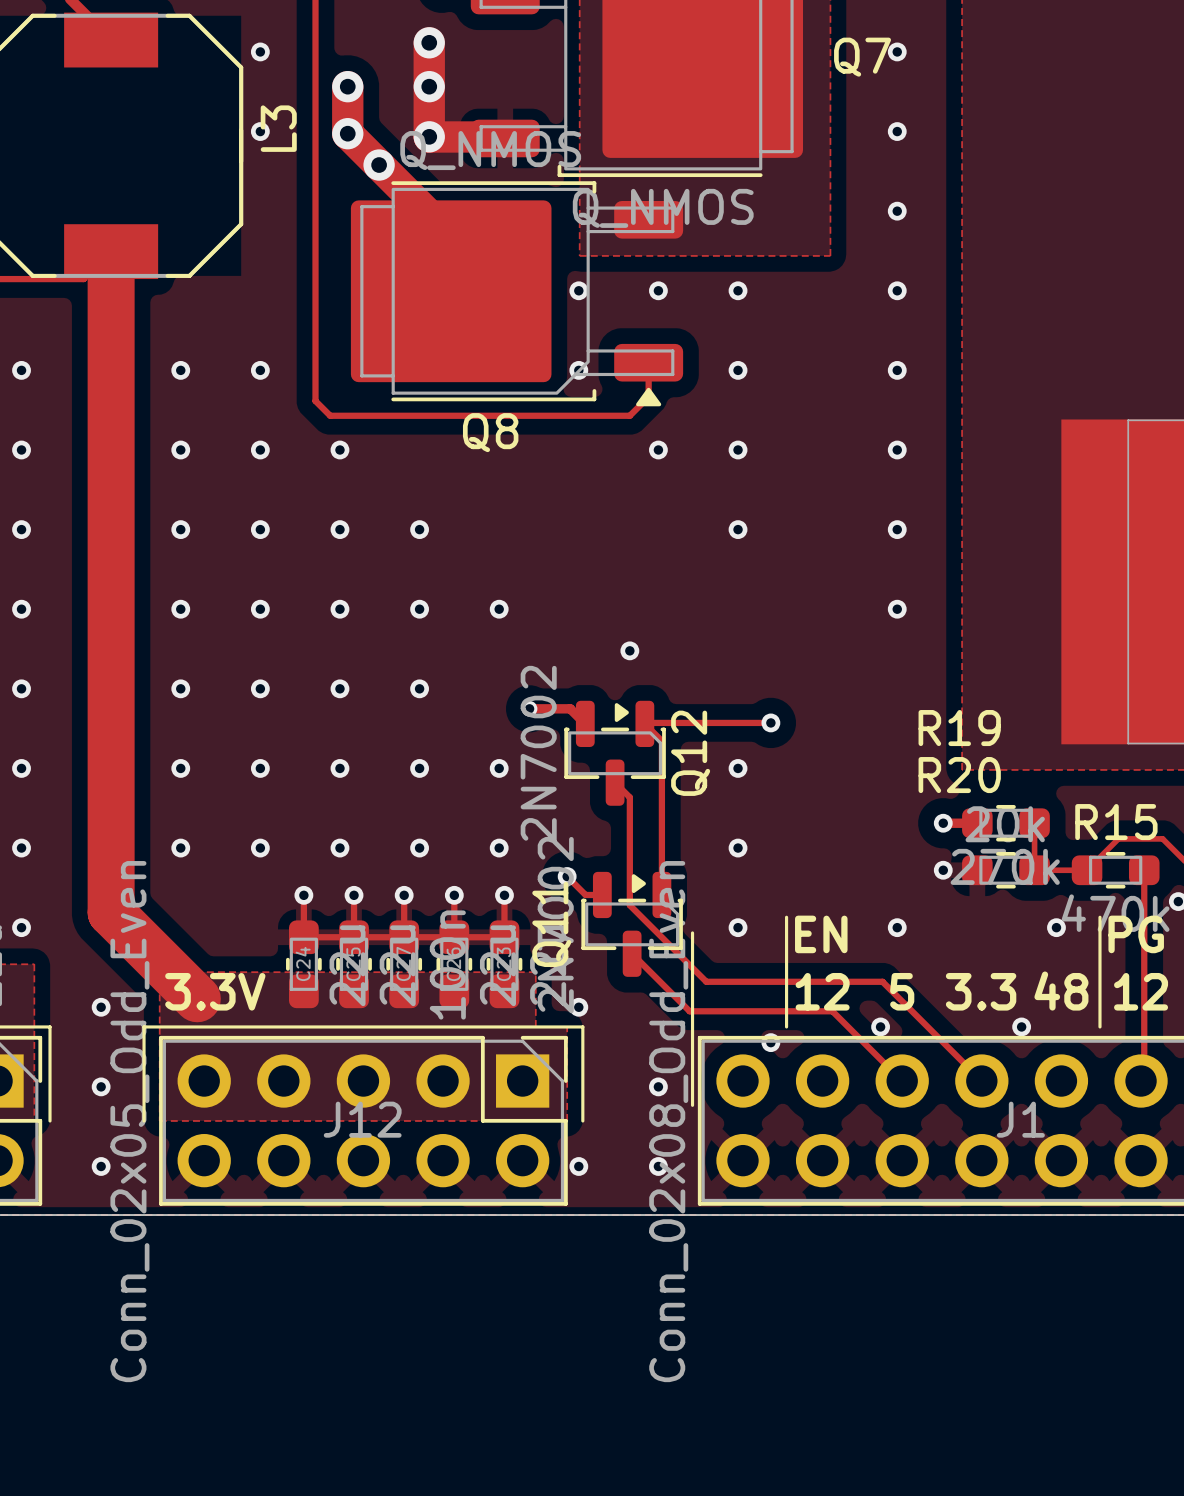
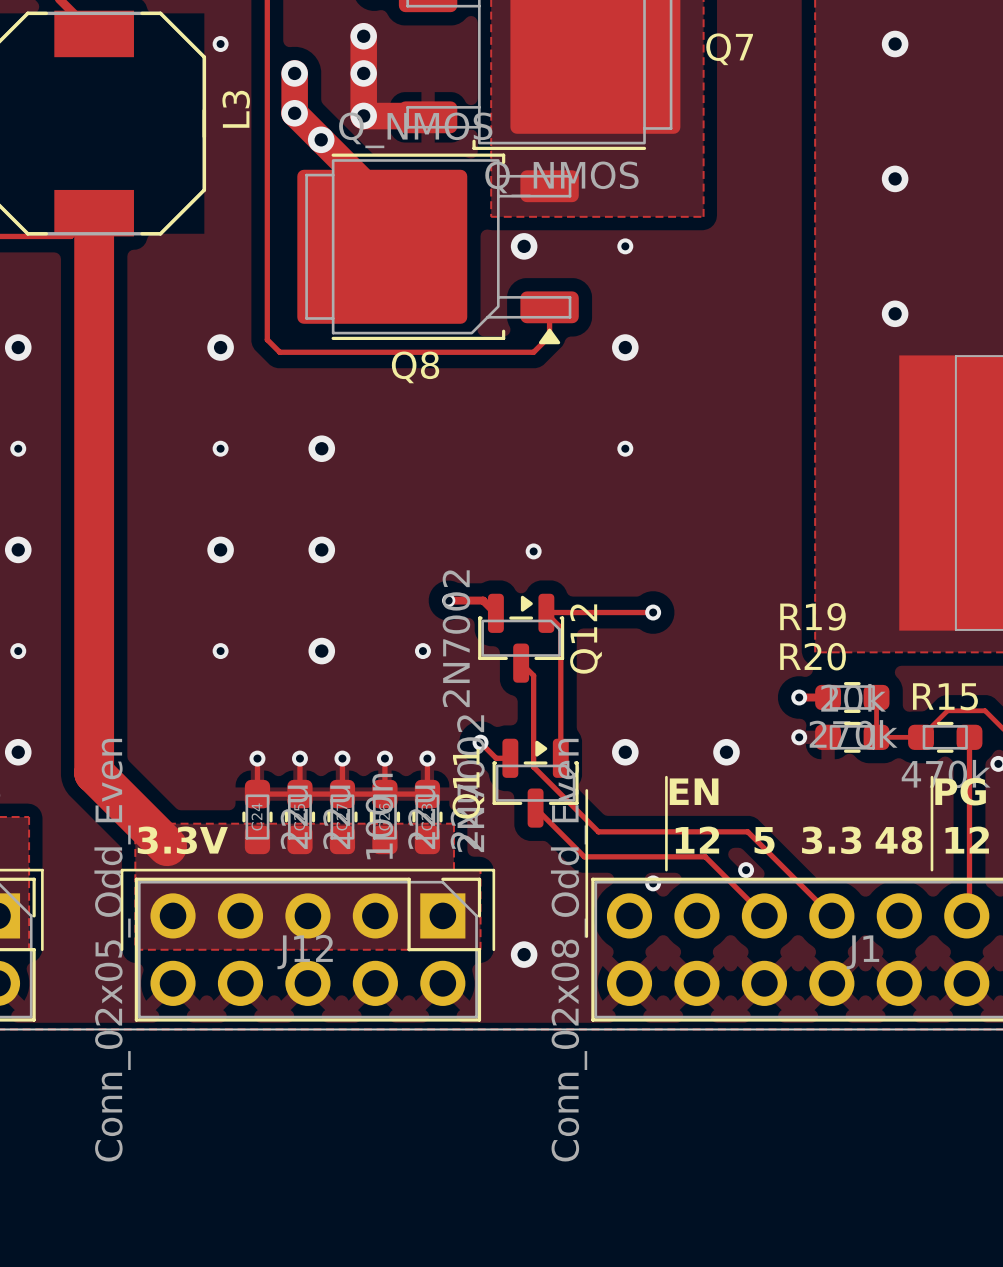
via: (897, 51) -> none
via: none -> (895, 44)
via: (260, 131) -> none
via: (897, 131) -> none
via: (897, 211) -> none
via: none -> (895, 178)
via: (578, 290) -> none
via: none -> (524, 246)
via: (658, 290) -> none
via: (897, 290) -> none
via: (21, 370) -> none
via: (180, 370) -> none
via: (260, 370) -> none
via: (578, 370) -> none
via: (738, 370) -> none
via: (897, 370) -> none
via: none -> (895, 313)
via: none -> (18, 347)
via: none -> (220, 347)
via: none -> (625, 347)
via: (21, 449) -> none
via: (180, 449) -> none
via: (260, 449) -> none
via: (339, 449) -> none
via: (658, 449) -> none
via: (738, 449) -> none
via: (897, 449) -> none
via: (180, 529) -> none
via: (339, 529) -> none
via: none -> (321, 448)
via: (419, 529) -> none
via: (897, 529) -> none
via: (21, 609) -> none
via: (180, 609) -> none
via: (260, 609) -> none
via: (339, 609) -> none
via: (419, 609) -> none
via: (499, 609) -> none
via: (897, 609) -> none
via: none -> (18, 549)
via: none -> (220, 549)
via: none -> (321, 549)
via: (21, 688) -> none
via: (180, 688) -> none
via: (260, 688) -> none
via: (339, 688) -> none
via: (419, 688) -> none
via: (180, 768) -> none
via: (339, 768) -> none
via: none -> (321, 651)
via: (419, 768) -> none
via: (738, 768) -> none
via: (21, 848) -> none
via: (180, 848) -> none
via: (260, 848) -> none
via: (339, 848) -> none
via: (419, 848) -> none
via: (499, 848) -> none
via: (738, 848) -> none
via: none -> (18, 752)
via: none -> (625, 752)
via: none -> (726, 752)
via: (21, 927) -> none
via: (738, 927) -> none
via: (897, 927) -> none
via: (1056, 927) -> none
via: (101, 1007) -> none
via: (578, 1007) -> none
via: (1021, 1026) -> none
via: (101, 1086) -> none
via: (658, 1086) -> none
via: none -> (524, 954)
via: (101, 1166) -> none
via: (578, 1166) -> none
via: (658, 1166) -> none

